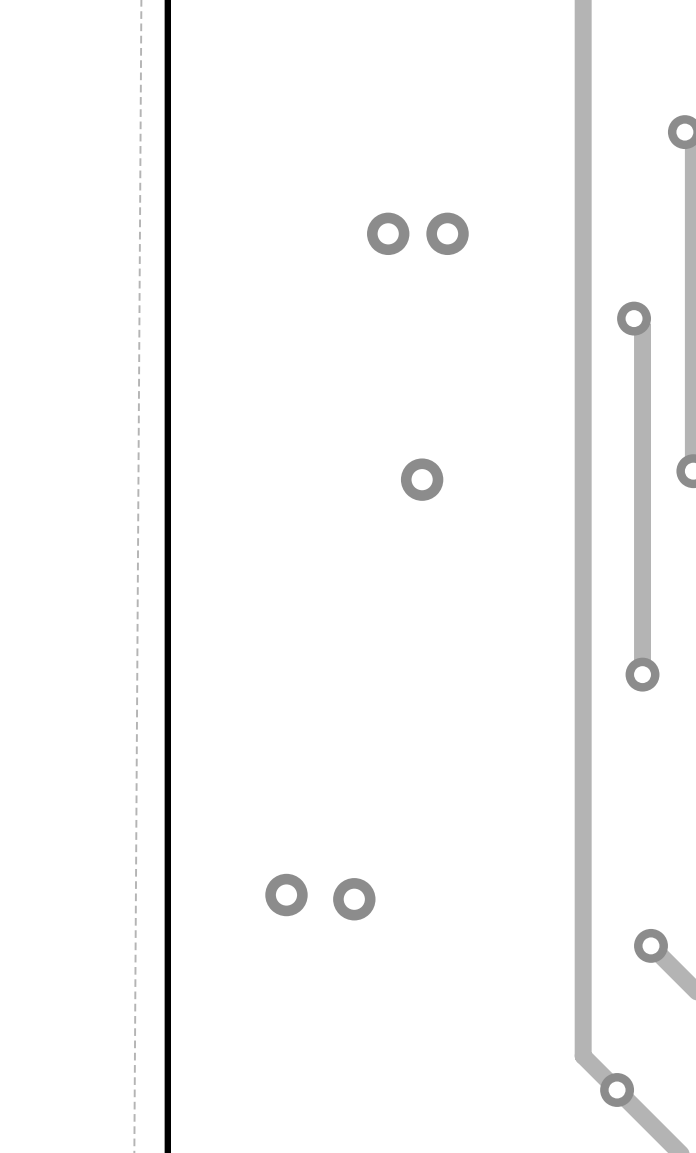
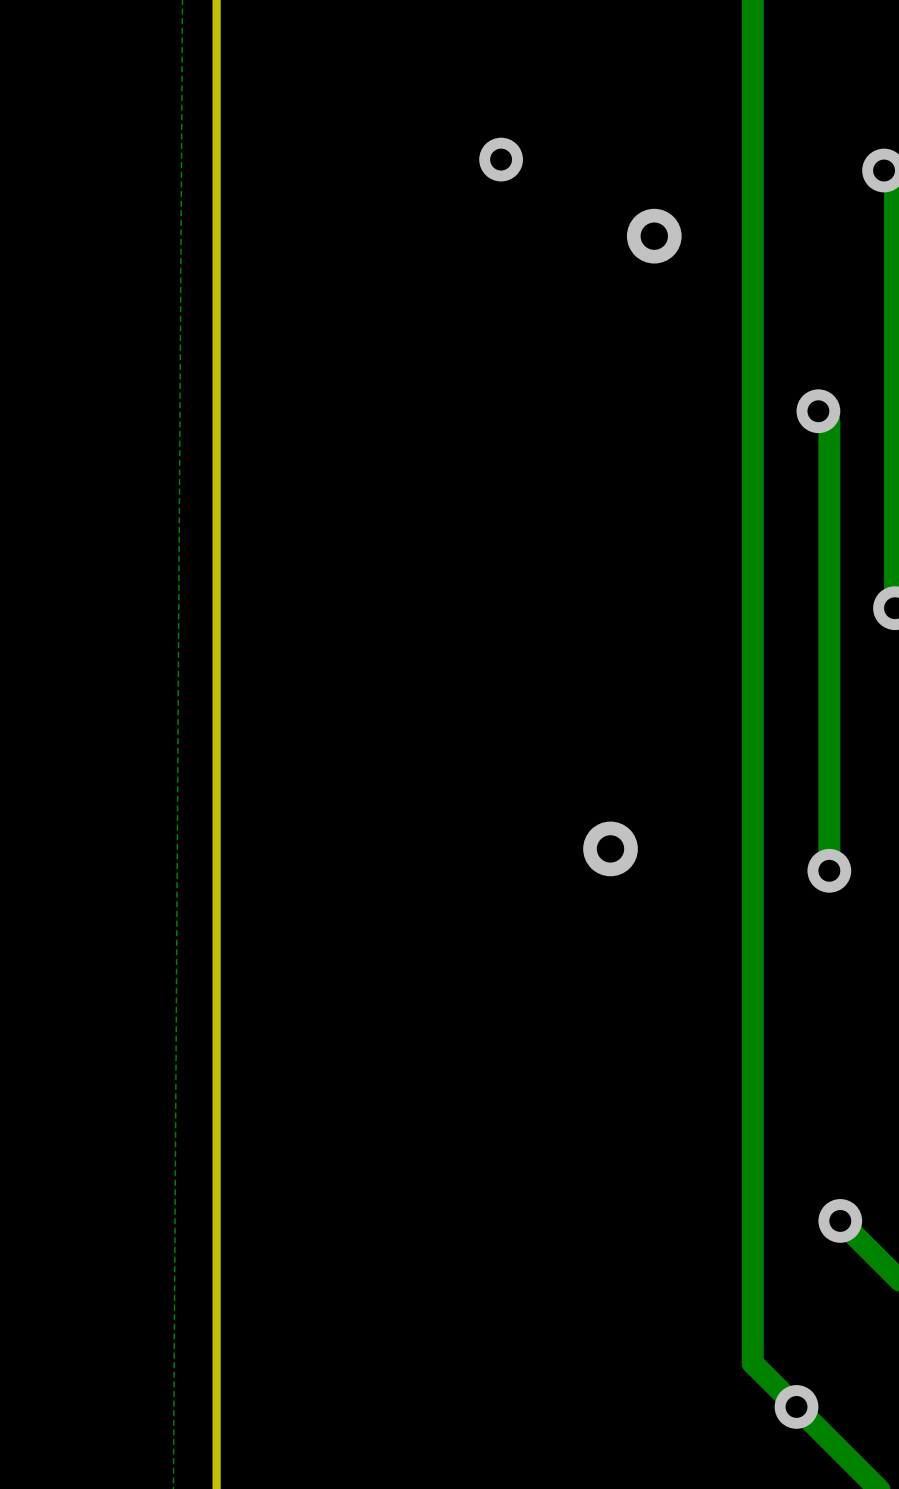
via: none -> (501, 159)
via: none -> (654, 236)
via: (388, 233) -> none
via: (447, 233) -> none
via: (422, 479) -> none
via: none -> (610, 848)
via: (286, 895) -> none
via: (354, 899) -> none

